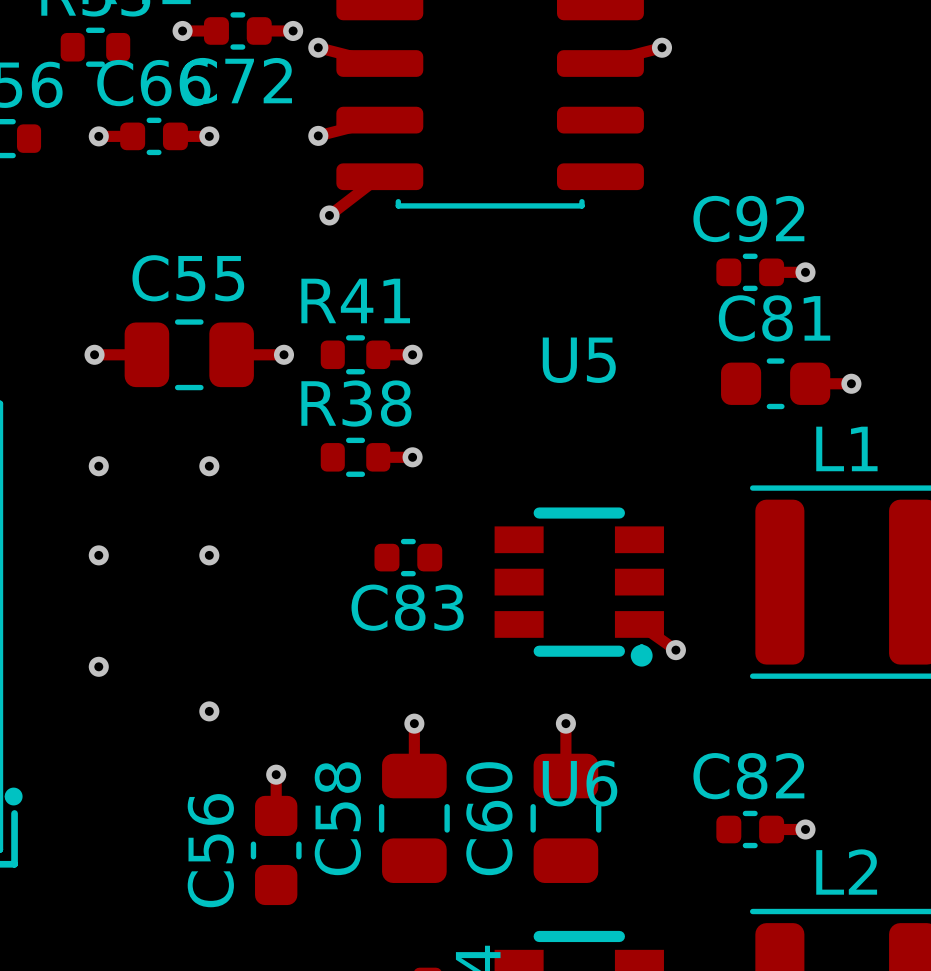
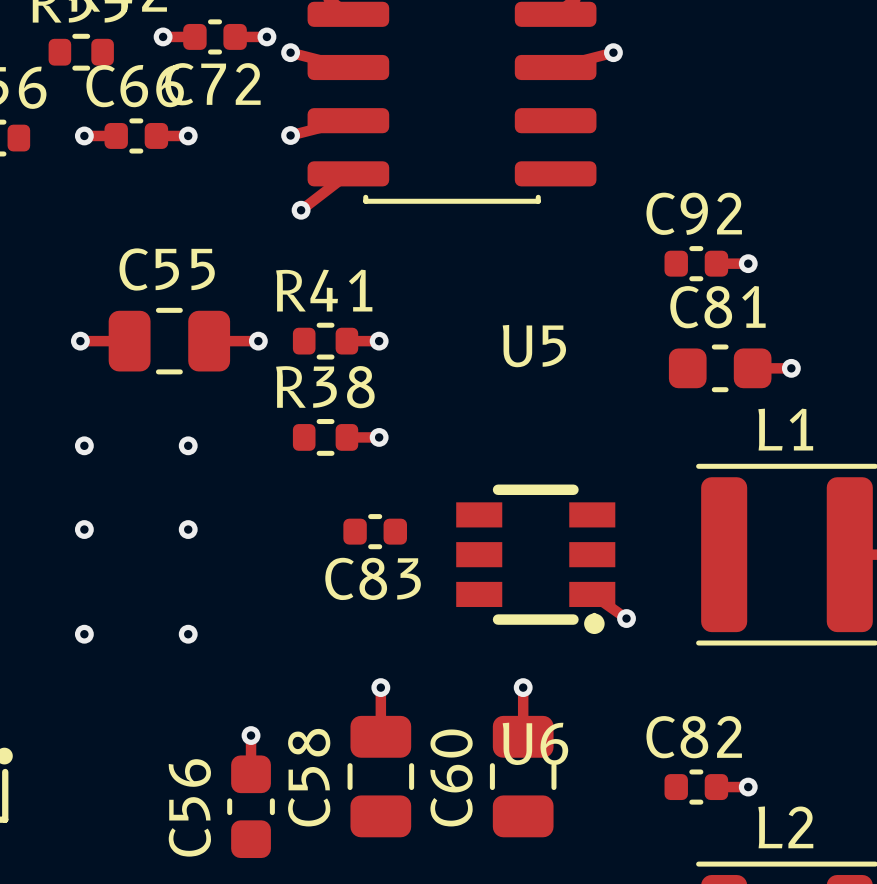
via position: (209, 711) -> (188, 634)

